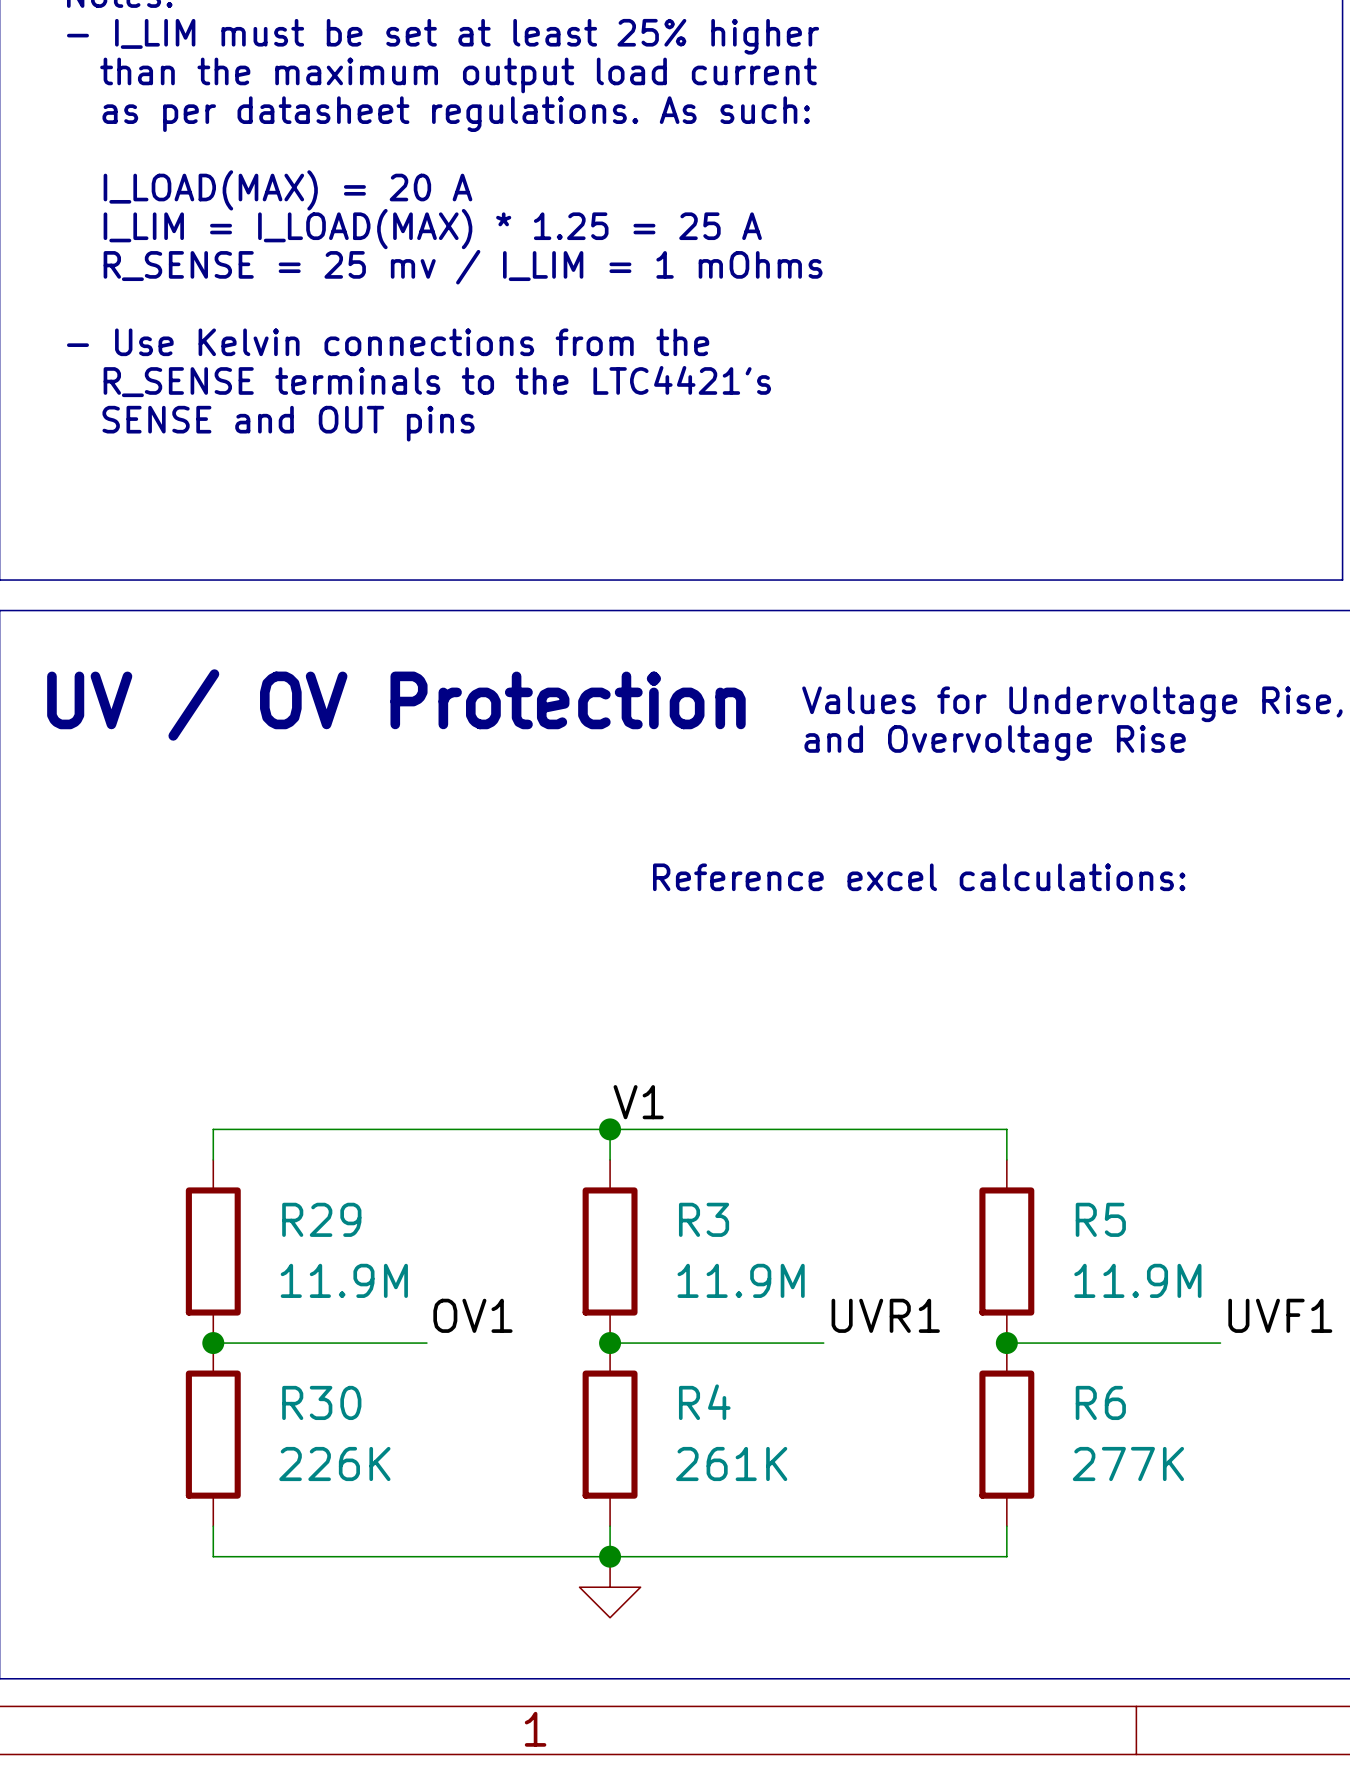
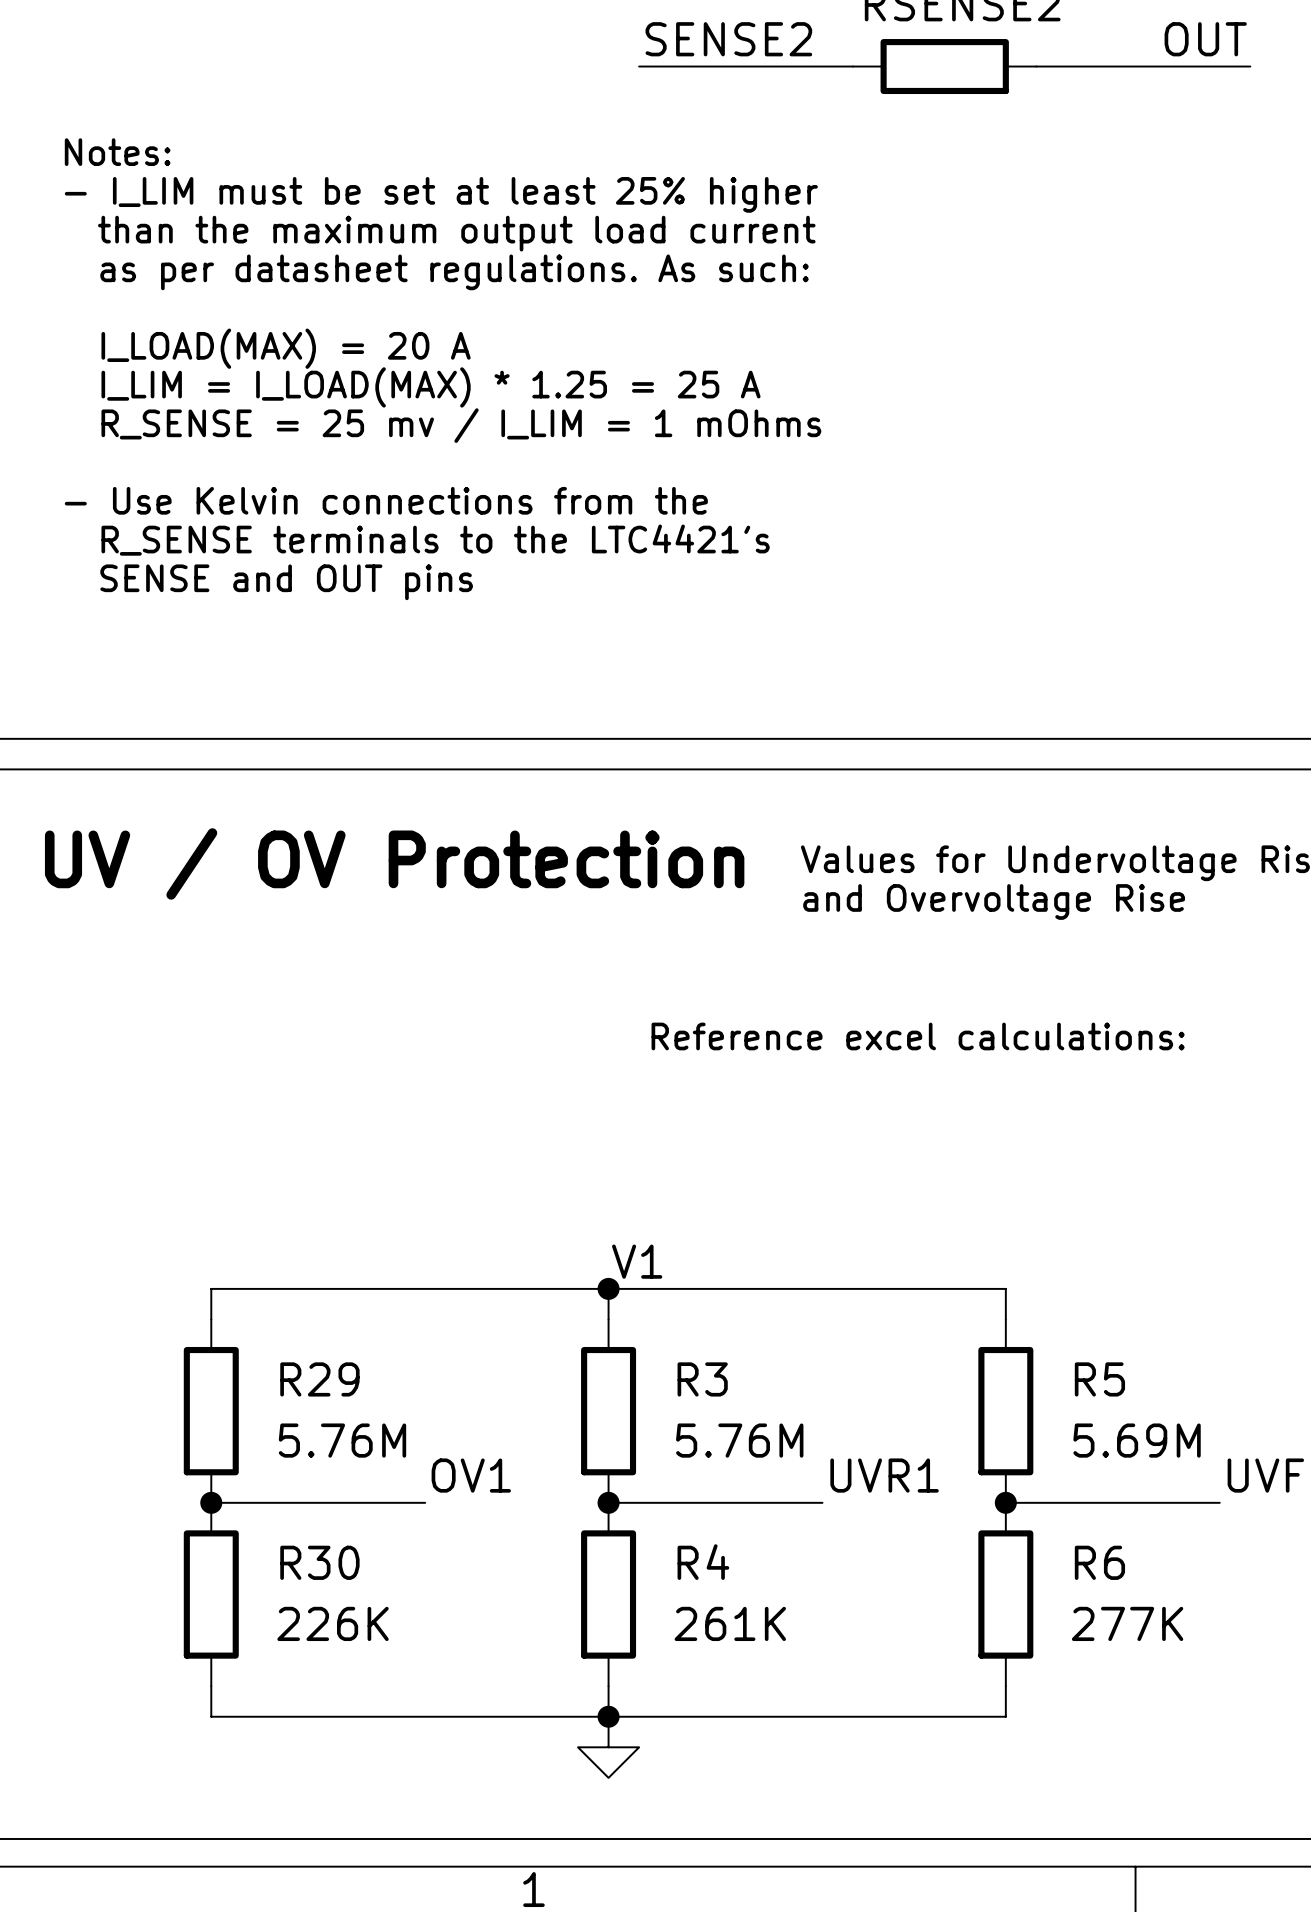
R29 value: 11.9M (344, 1280) -> 5.76M (342, 1440)
R3 value: 11.9M (741, 1280) -> 5.76M (739, 1440)
R5 value: 11.9M (1137, 1280) -> 5.69M (1137, 1440)

